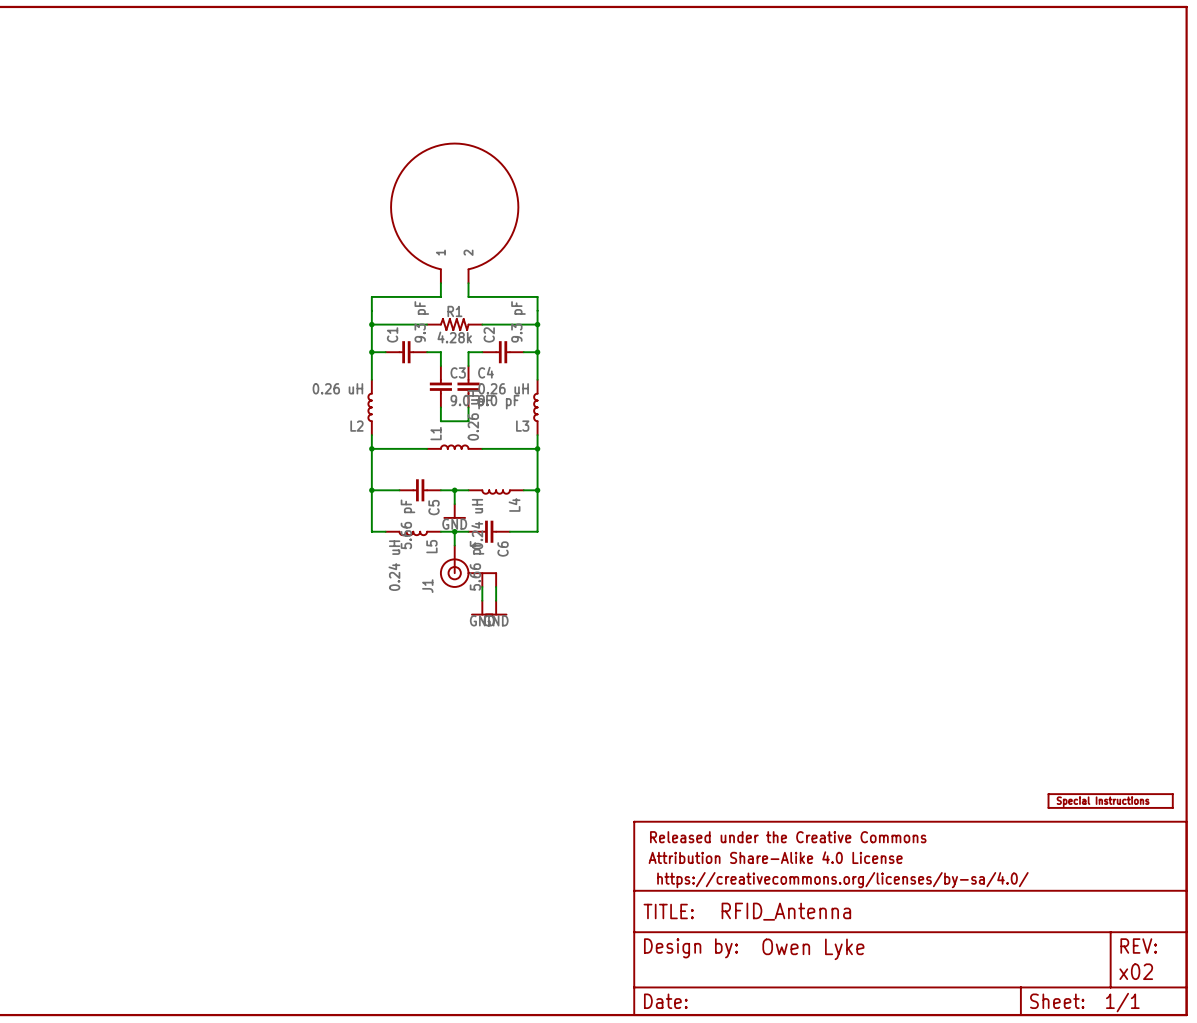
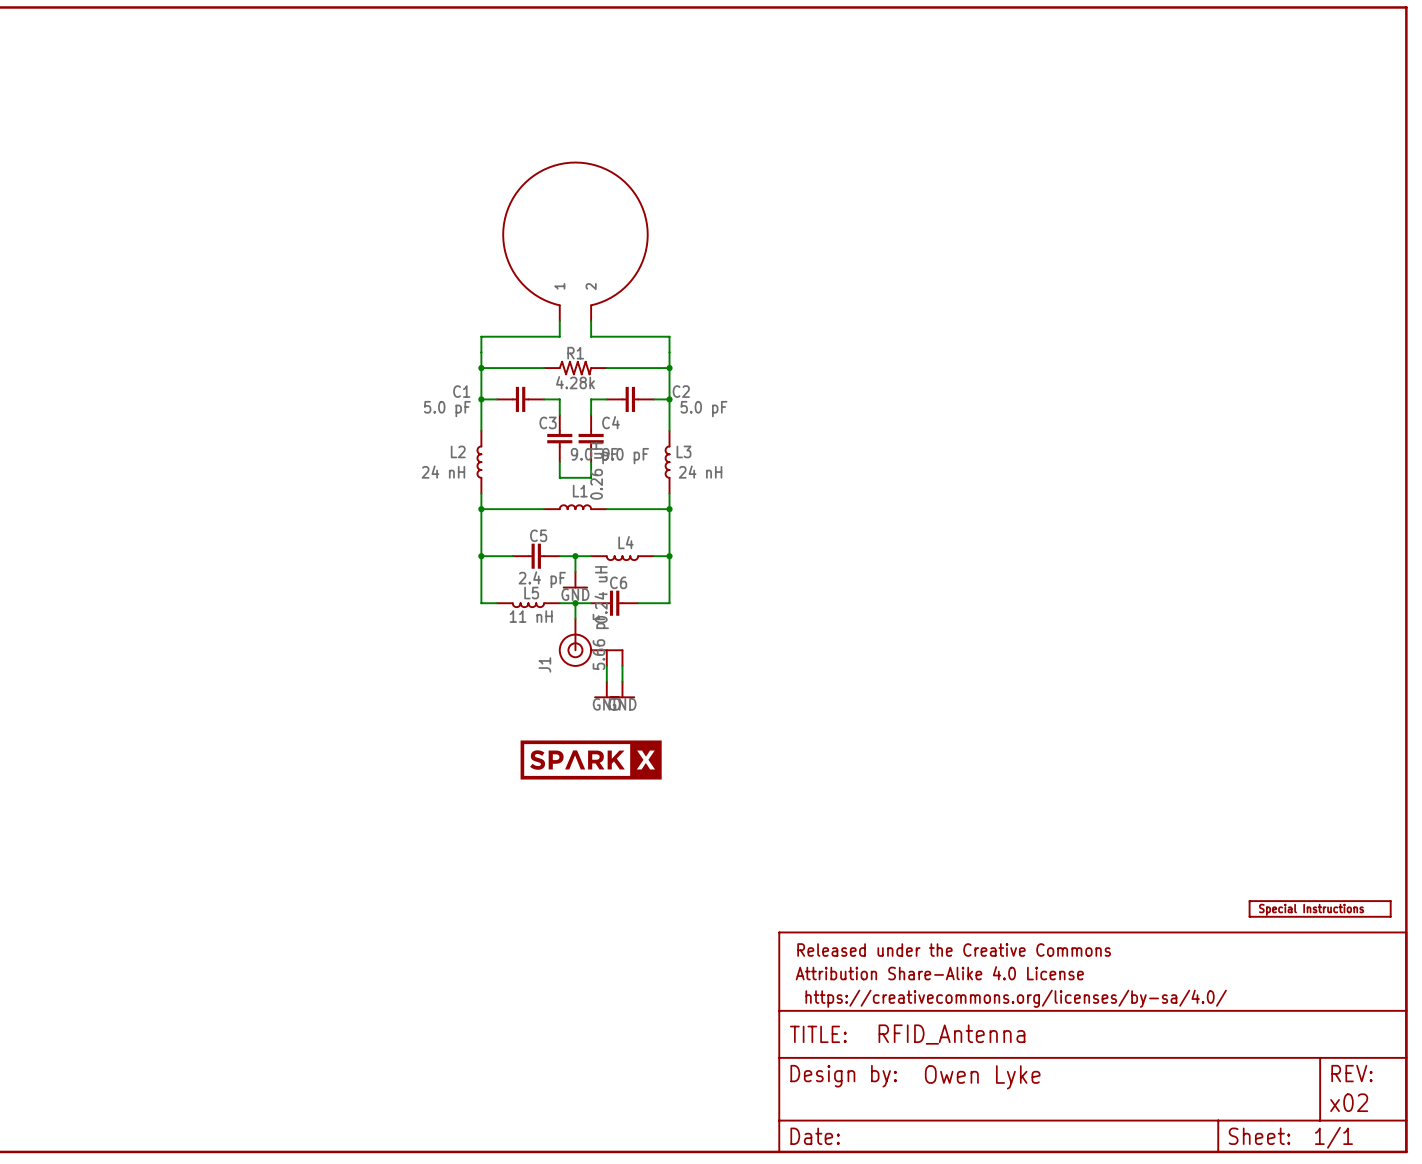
C1 value: 9.3 pF (421, 321) -> 5.0 pF (447, 409)
C2 value: 9.3 pF (518, 321) -> 5.0 pF (703, 409)
C1 name rotation: 0° (392, 334) -> 90° clockwise (461, 391)
C1 name position: C1 (392, 334) -> C1 (461, 391)
C2 name rotation: 0° (489, 334) -> 90° clockwise (681, 391)
C2 name position: C2 (489, 334) -> C2 (681, 391)
C3 name position: C3 (458, 372) -> C3 (548, 422)
L2 value: 0.26 uH (337, 388) -> 24 nH (443, 472)
L3 value: 0.26 uH (503, 388) -> 24 nH (700, 472)
L2 name position: L2 (356, 426) -> L2 (458, 451)
L3 name position: L3 (522, 426) -> L3 (683, 451)
L1 name rotation: 0° (436, 433) -> 90° clockwise (580, 491)
L1 name position: L1 (436, 433) -> L1 (580, 491)
L4 name rotation: 0° (514, 504) -> 90° clockwise (625, 542)
L4 name position: L4 (514, 504) -> L4 (625, 542)
C5 name rotation: 0° (433, 507) -> 90° clockwise (538, 535)
C5 name position: C5 (433, 507) -> C5 (538, 535)
C5 value: 5.66 pF (407, 524) -> 2.4 pF (542, 579)
L5 name rotation: 0° (431, 546) -> 90° clockwise (531, 593)
L5 name position: L5 (431, 546) -> L5 (531, 593)
C6 name rotation: 0° (503, 549) -> 90° clockwise (618, 582)
C6 name position: C6 (503, 549) -> C6 (618, 582)
L5 value: 0.24 uH (394, 565) -> 11 nH (531, 616)
part: none -> (591, 760)

